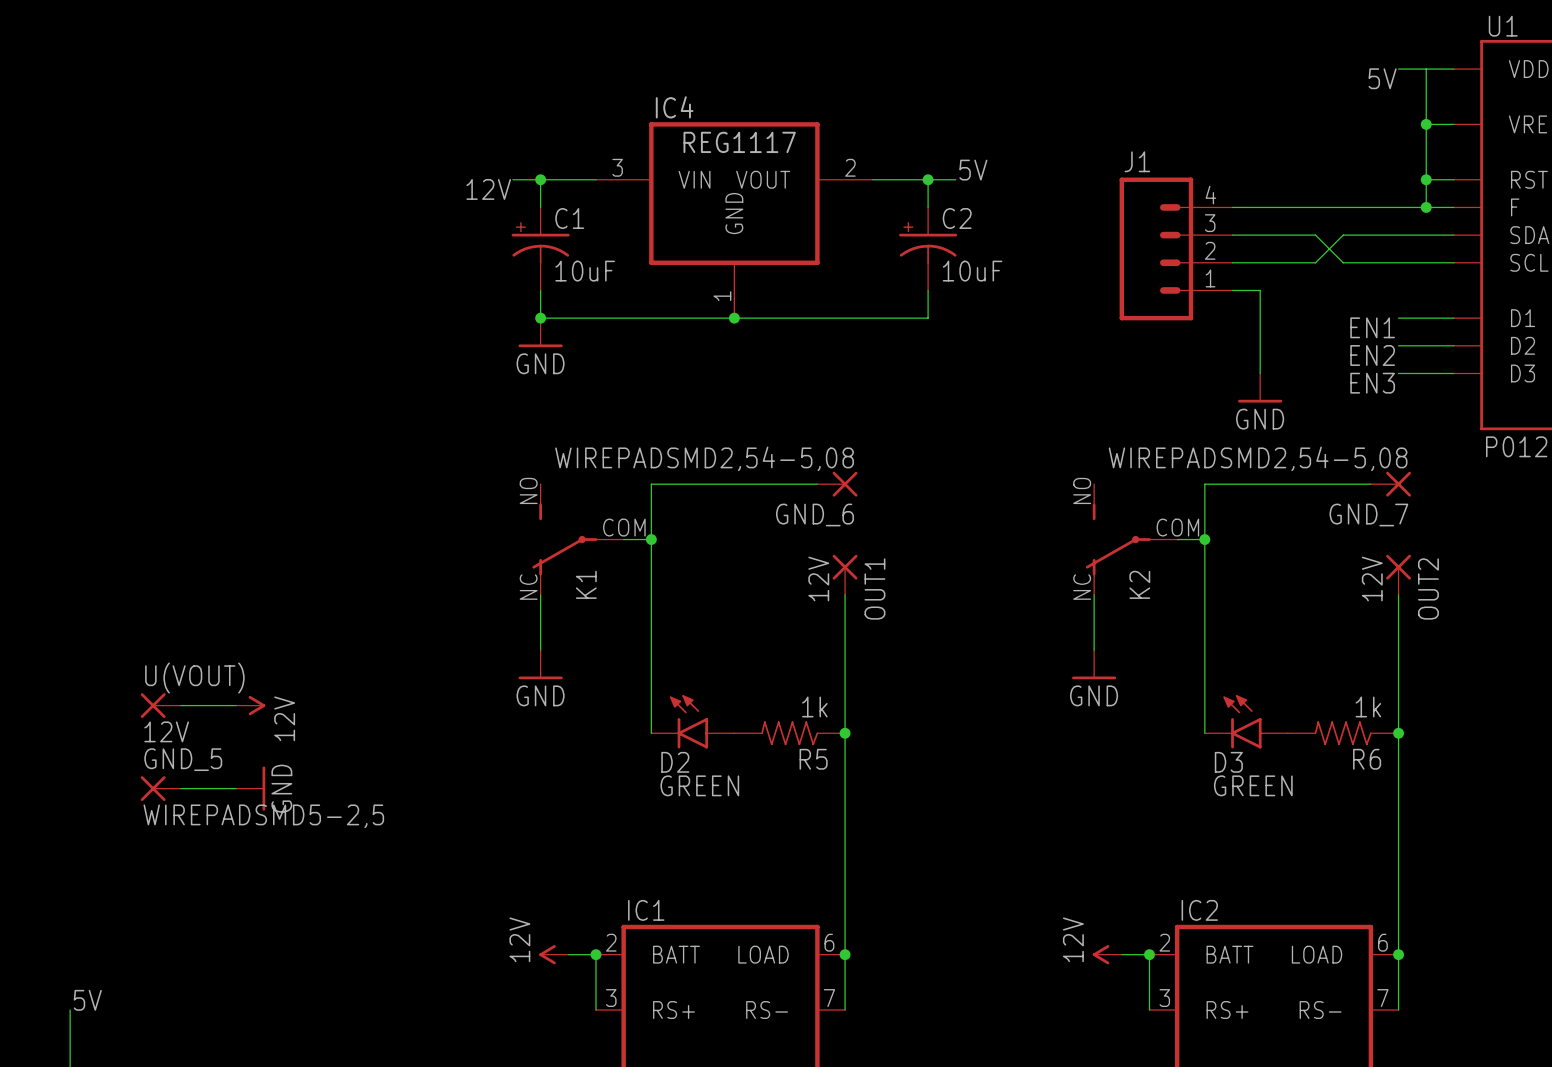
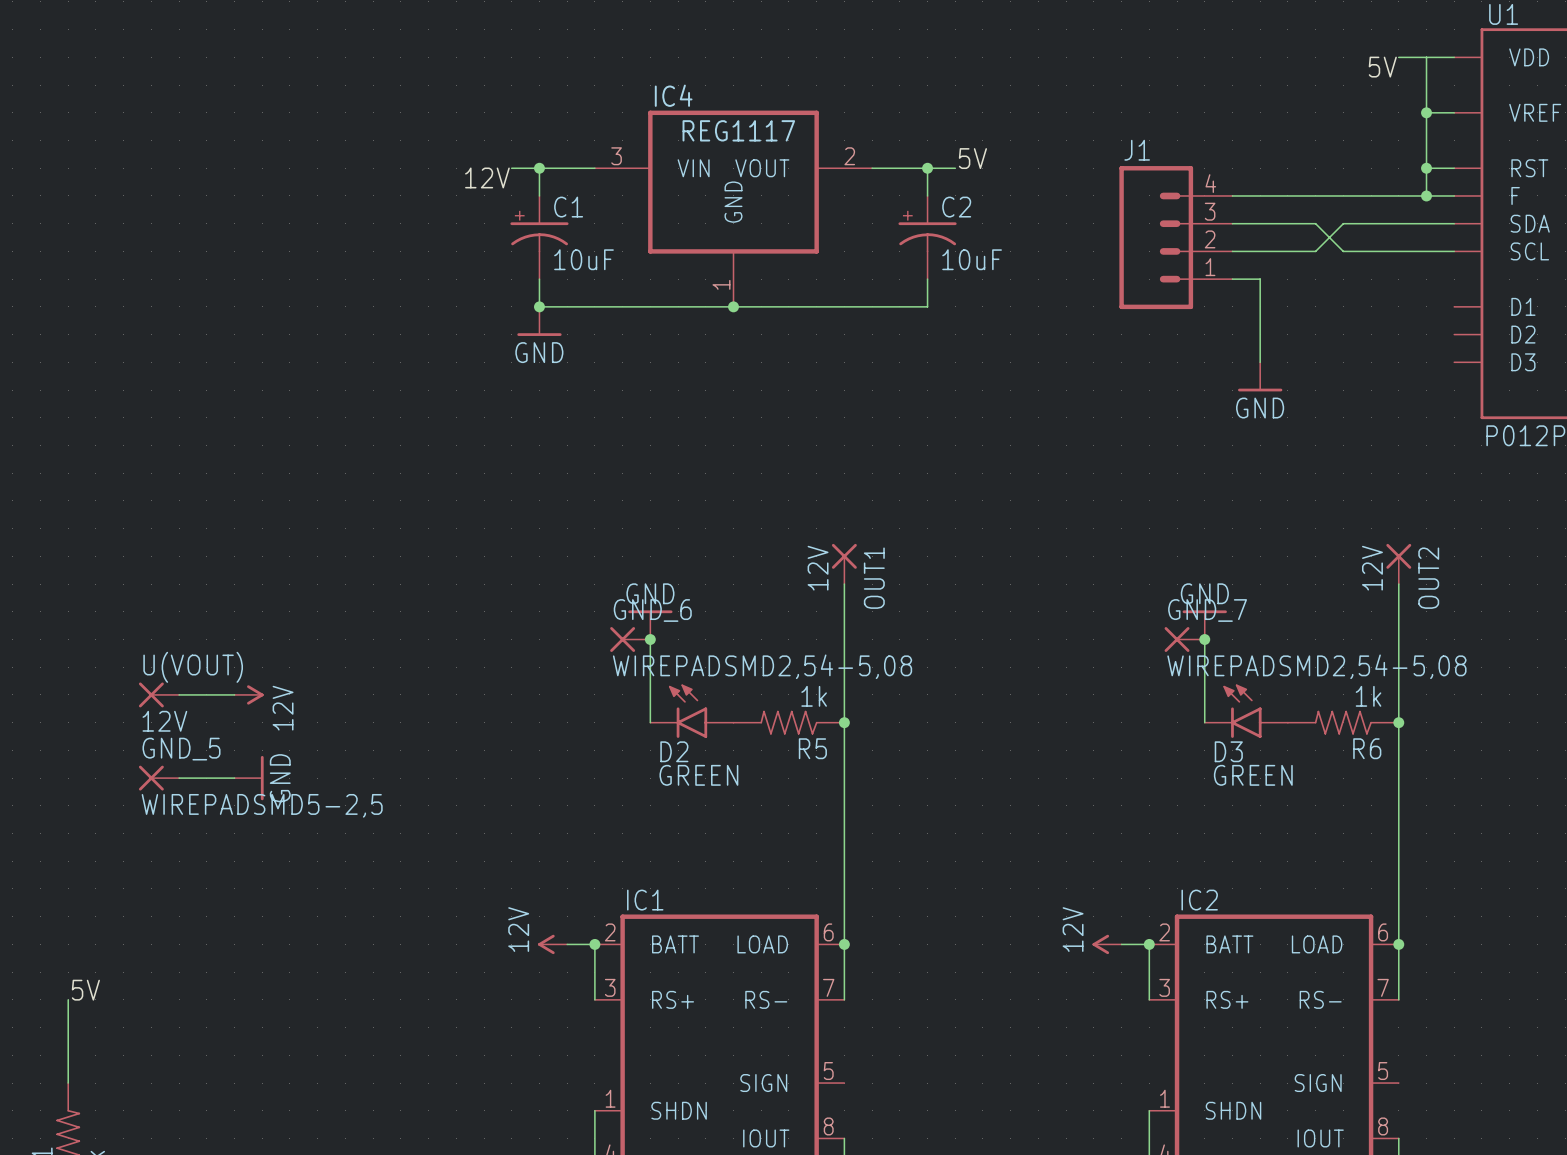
wire: (1398, 318) (1453, 318) -> none
label: EN1 (1372, 327) -> none
wire: (1398, 345) (1453, 345) -> none
label: EN2 (1372, 355) -> none
wire: (1398, 373) (1453, 373) -> none
label: EN3 (1372, 383) -> none
wire: (817, 484) (651, 484) (651, 650) -> none
GND_6 position: (837, 484) -> (630, 639)
GND_6 rotation: 0° (845, 484) -> 180° (622, 639)
wire: (1370, 484) (1204, 484) (1204, 650) -> none
GND_7 position: (1390, 484) -> (1184, 639)
GND_7 rotation: 0° (1398, 484) -> 180° (1177, 639)
K1: (578, 539) -> none
wire: (623, 539) (651, 539) -> none
junction: (651, 539) -> none
K2: (1131, 539) -> none
wire: (1177, 539) (1204, 539) -> none
junction: (1204, 539) -> none
wire: (540, 594) (540, 650) -> none
wire: (1094, 594) (1094, 650) -> none
junction: none -> (650, 639)
junction: none -> (1204, 639)
power symbol position: GND (540, 664) -> GND (650, 624)
power symbol position: GND (1094, 664) -> GND (1204, 624)
power symbol rotation: 0° (540, 677) -> 180° (650, 611)
power symbol rotation: 0° (1094, 677) -> 180° (1204, 611)

